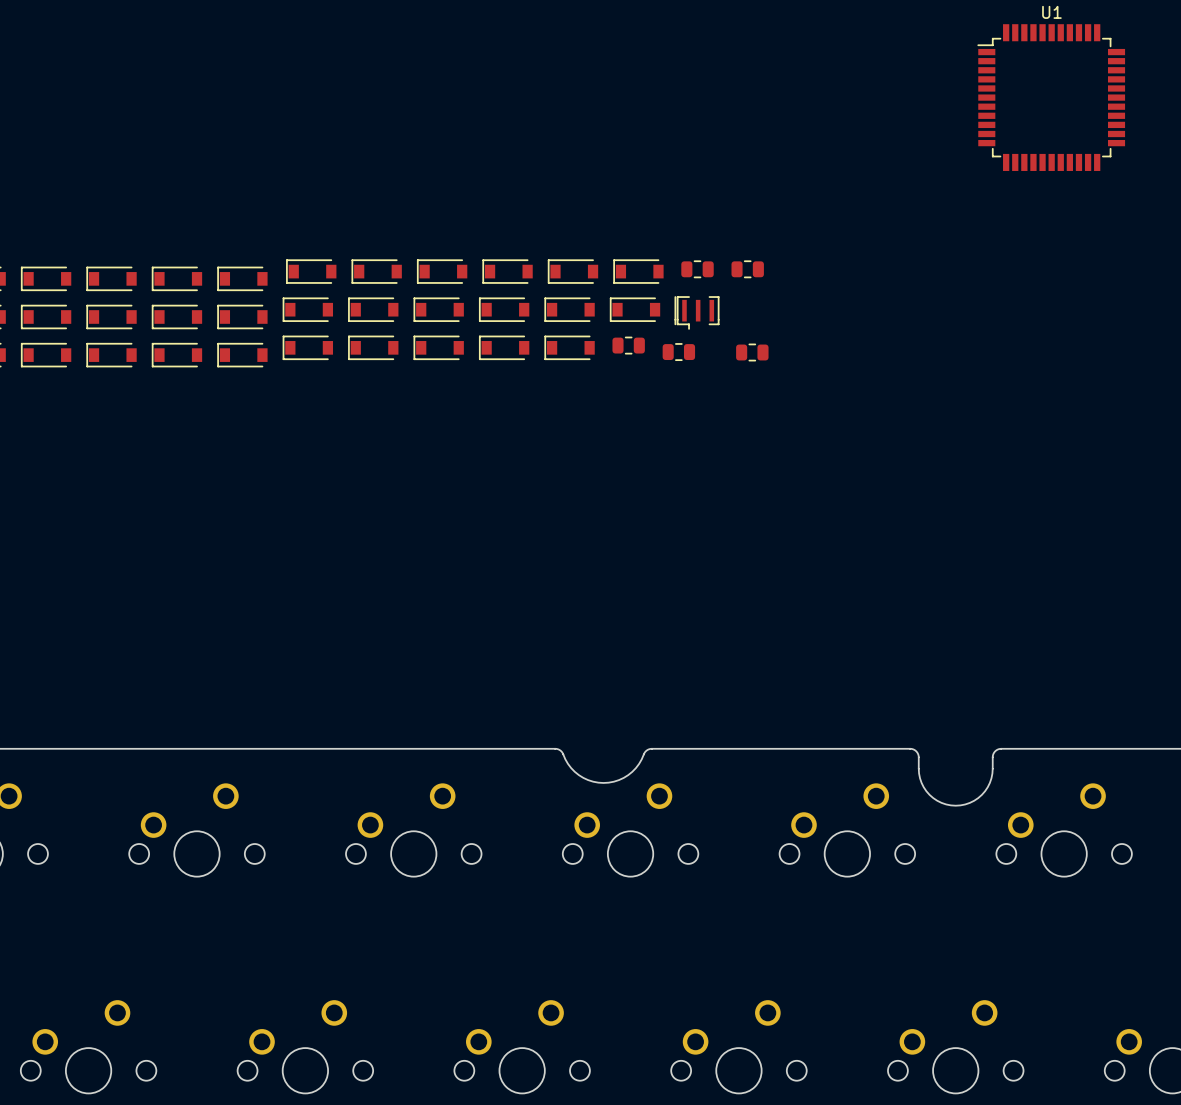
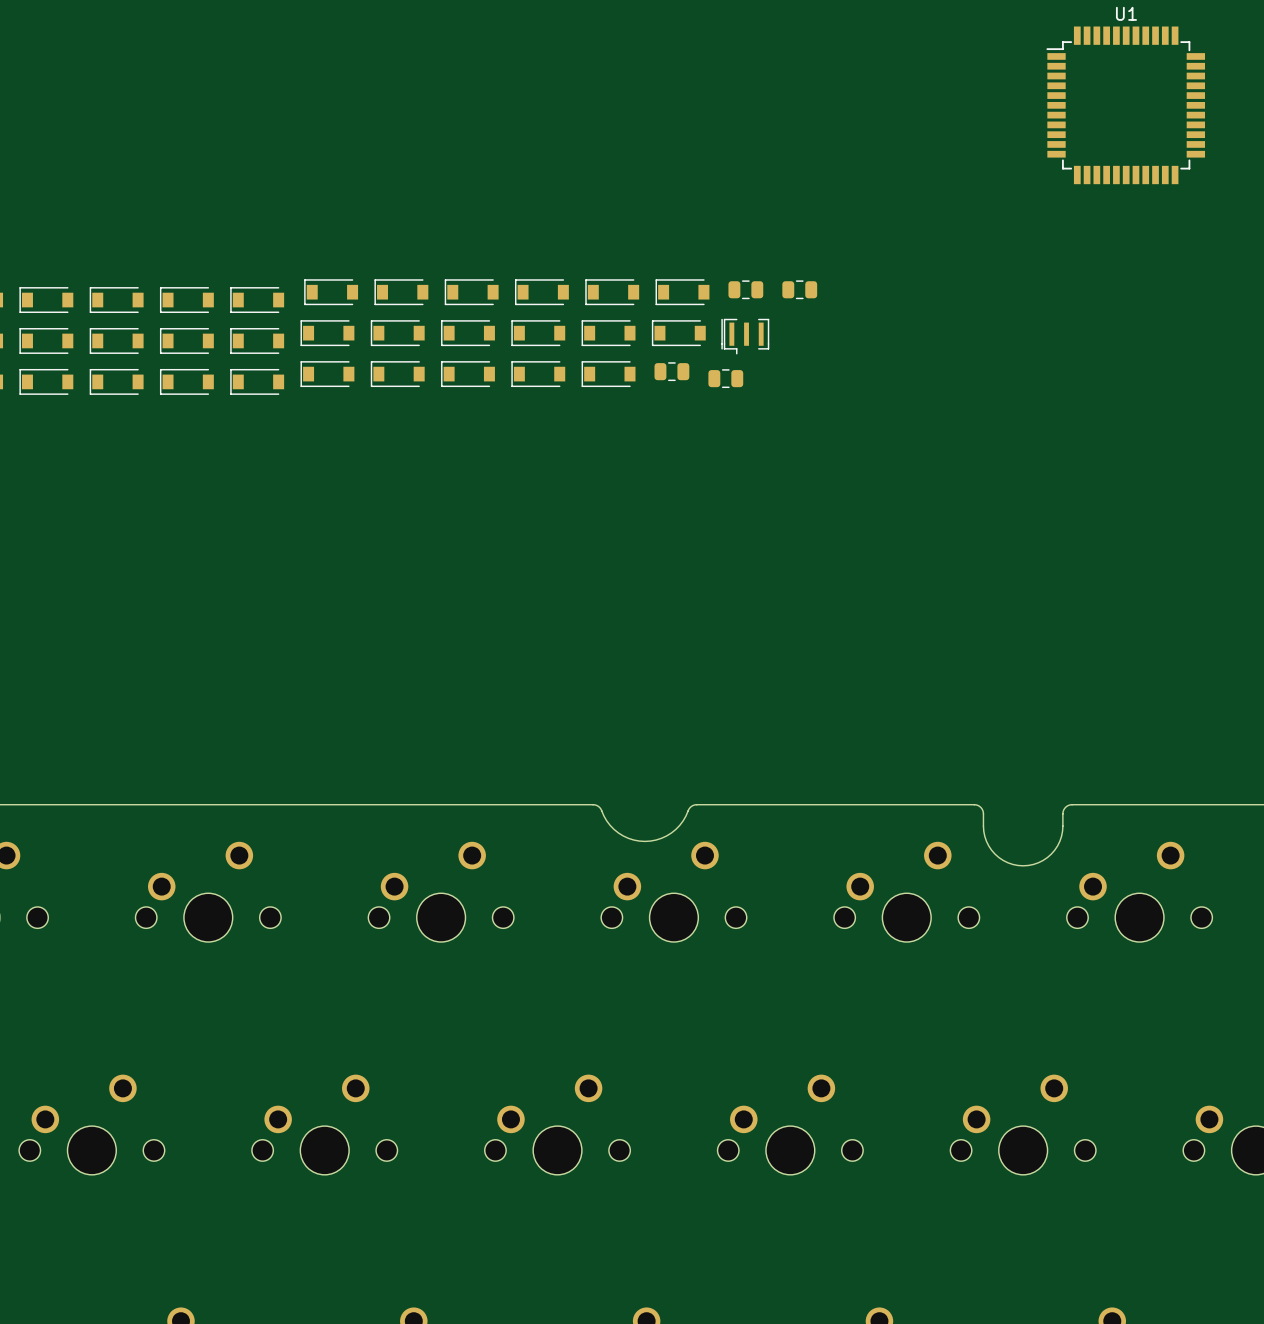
part: (752, 352) -> none

